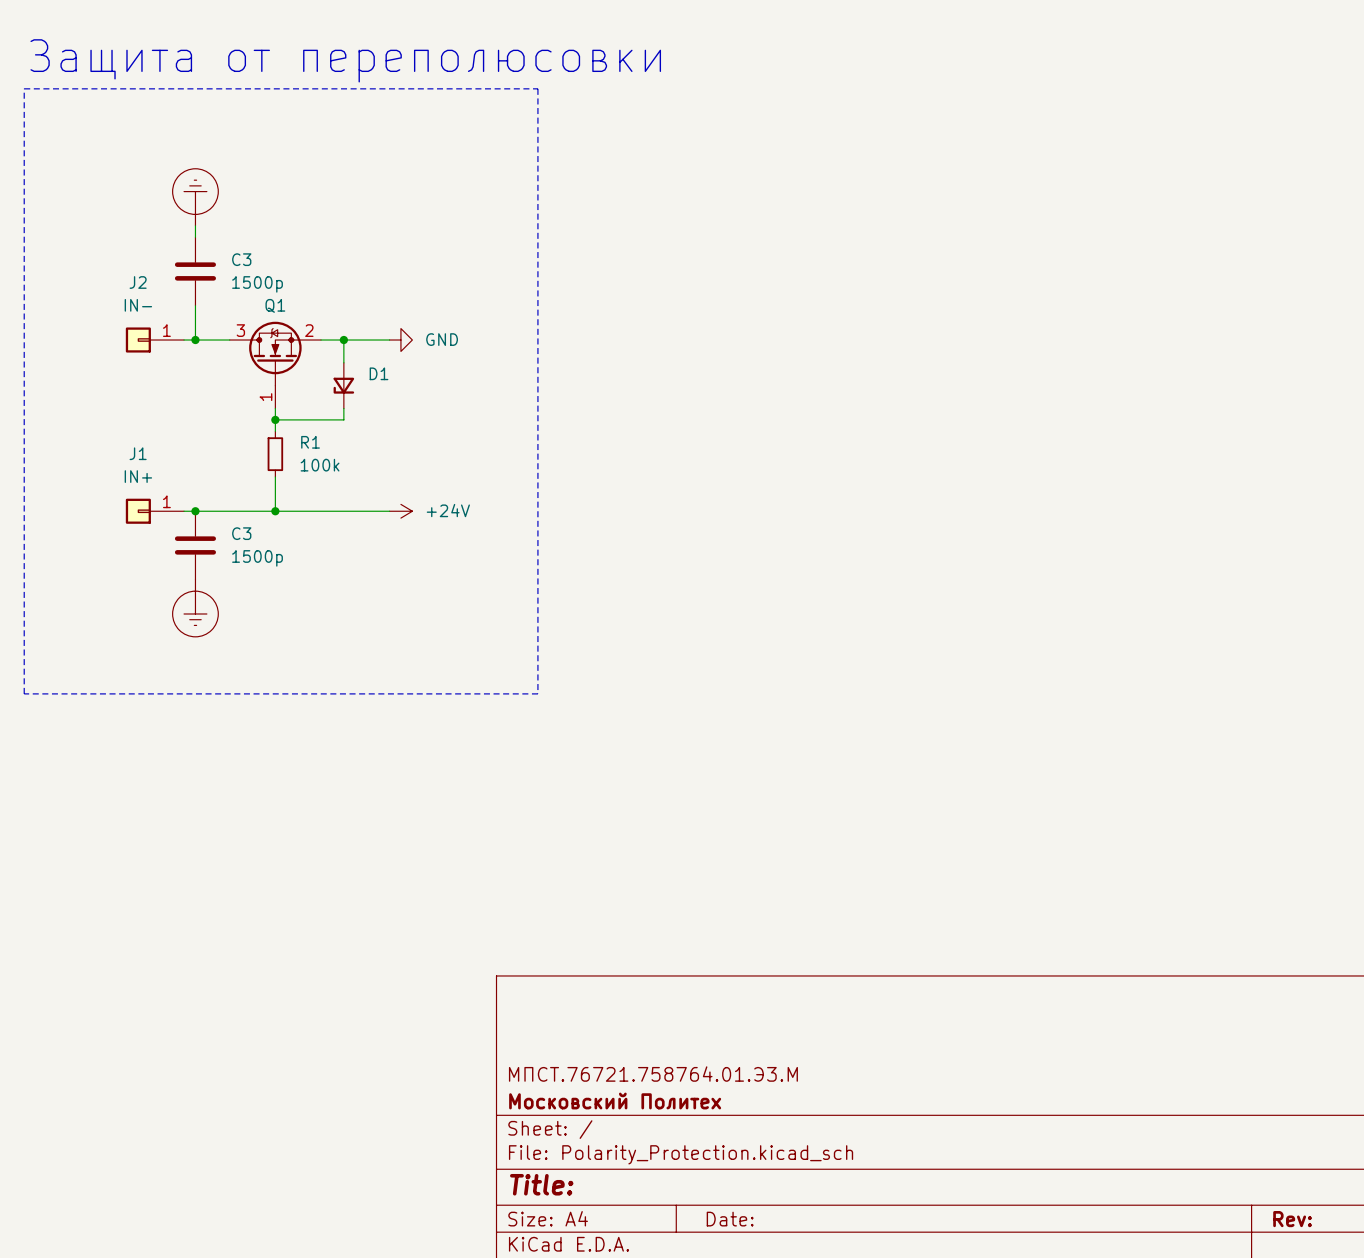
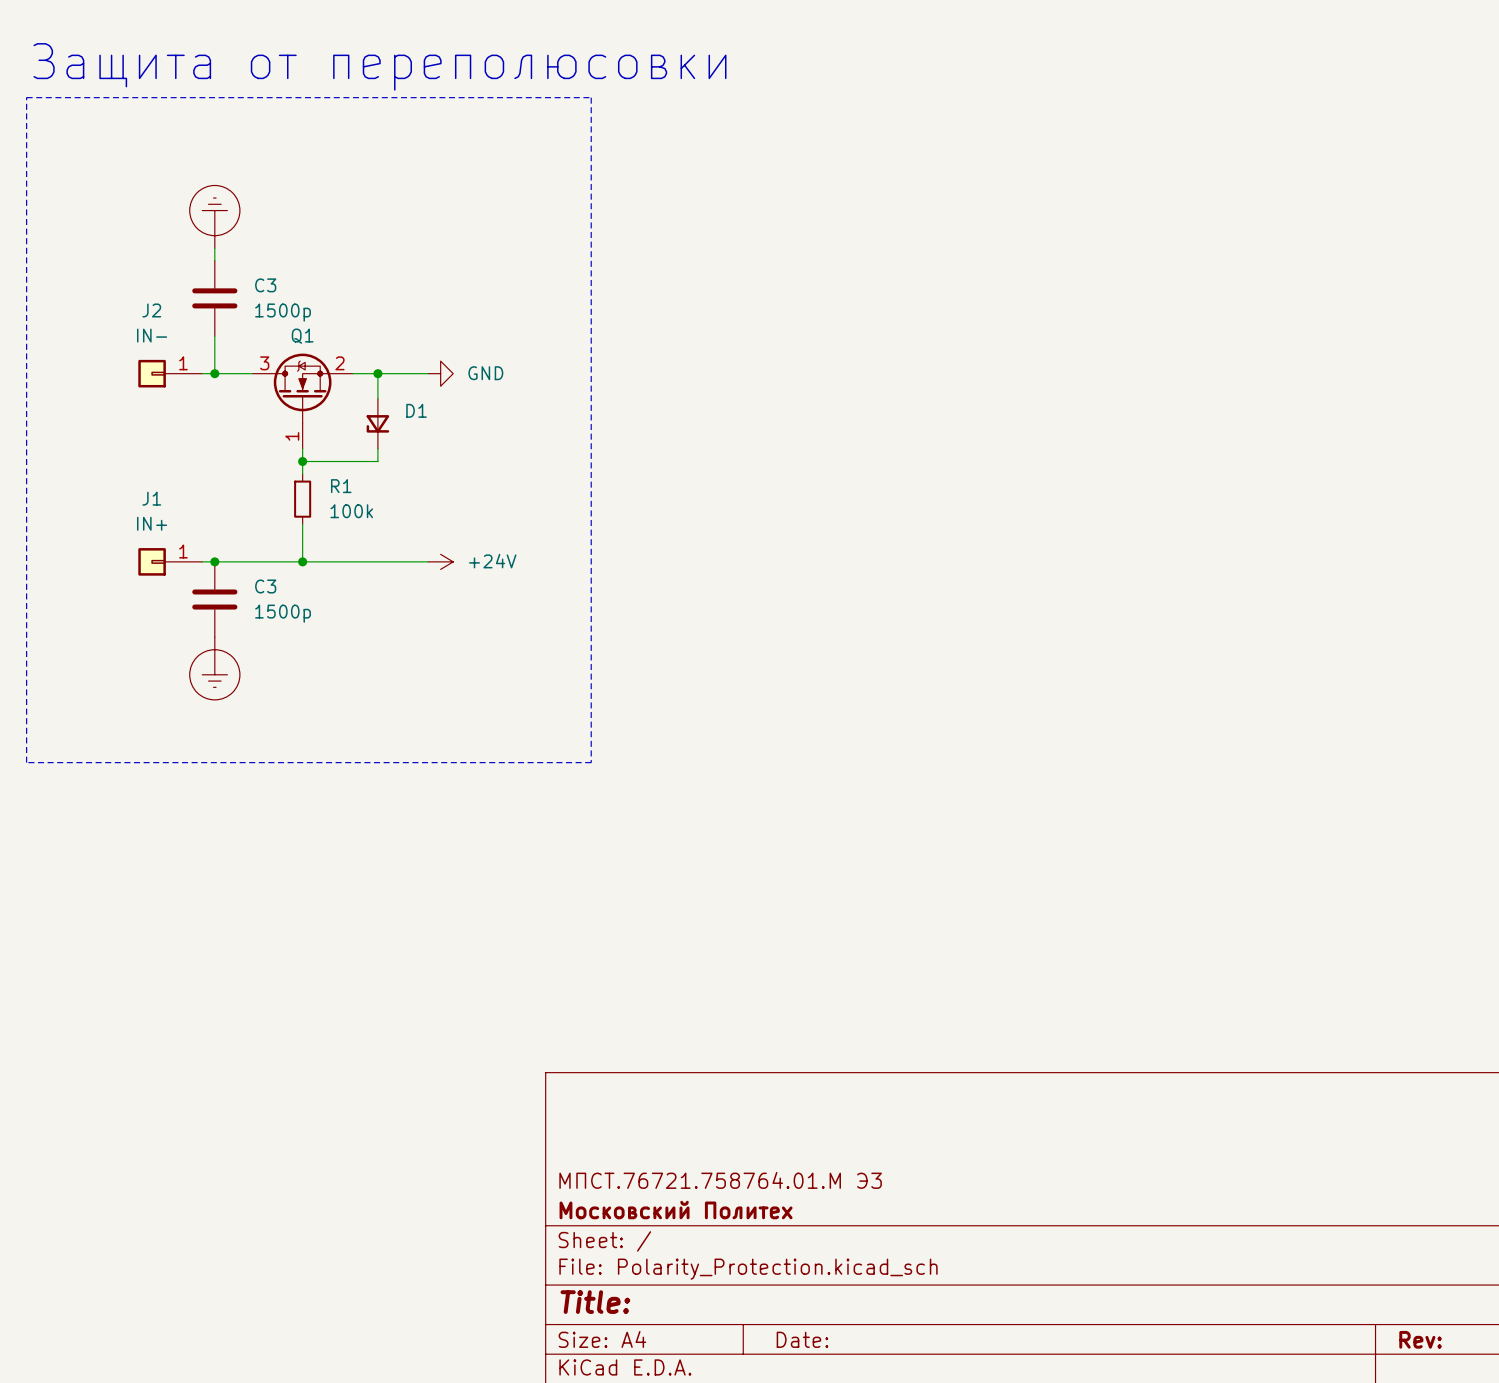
title block: МПСТ.76721.758764.01.Э3.М (653, 1074) -> МПСТ.76721.758764.01.М Э3 (720, 1180)

